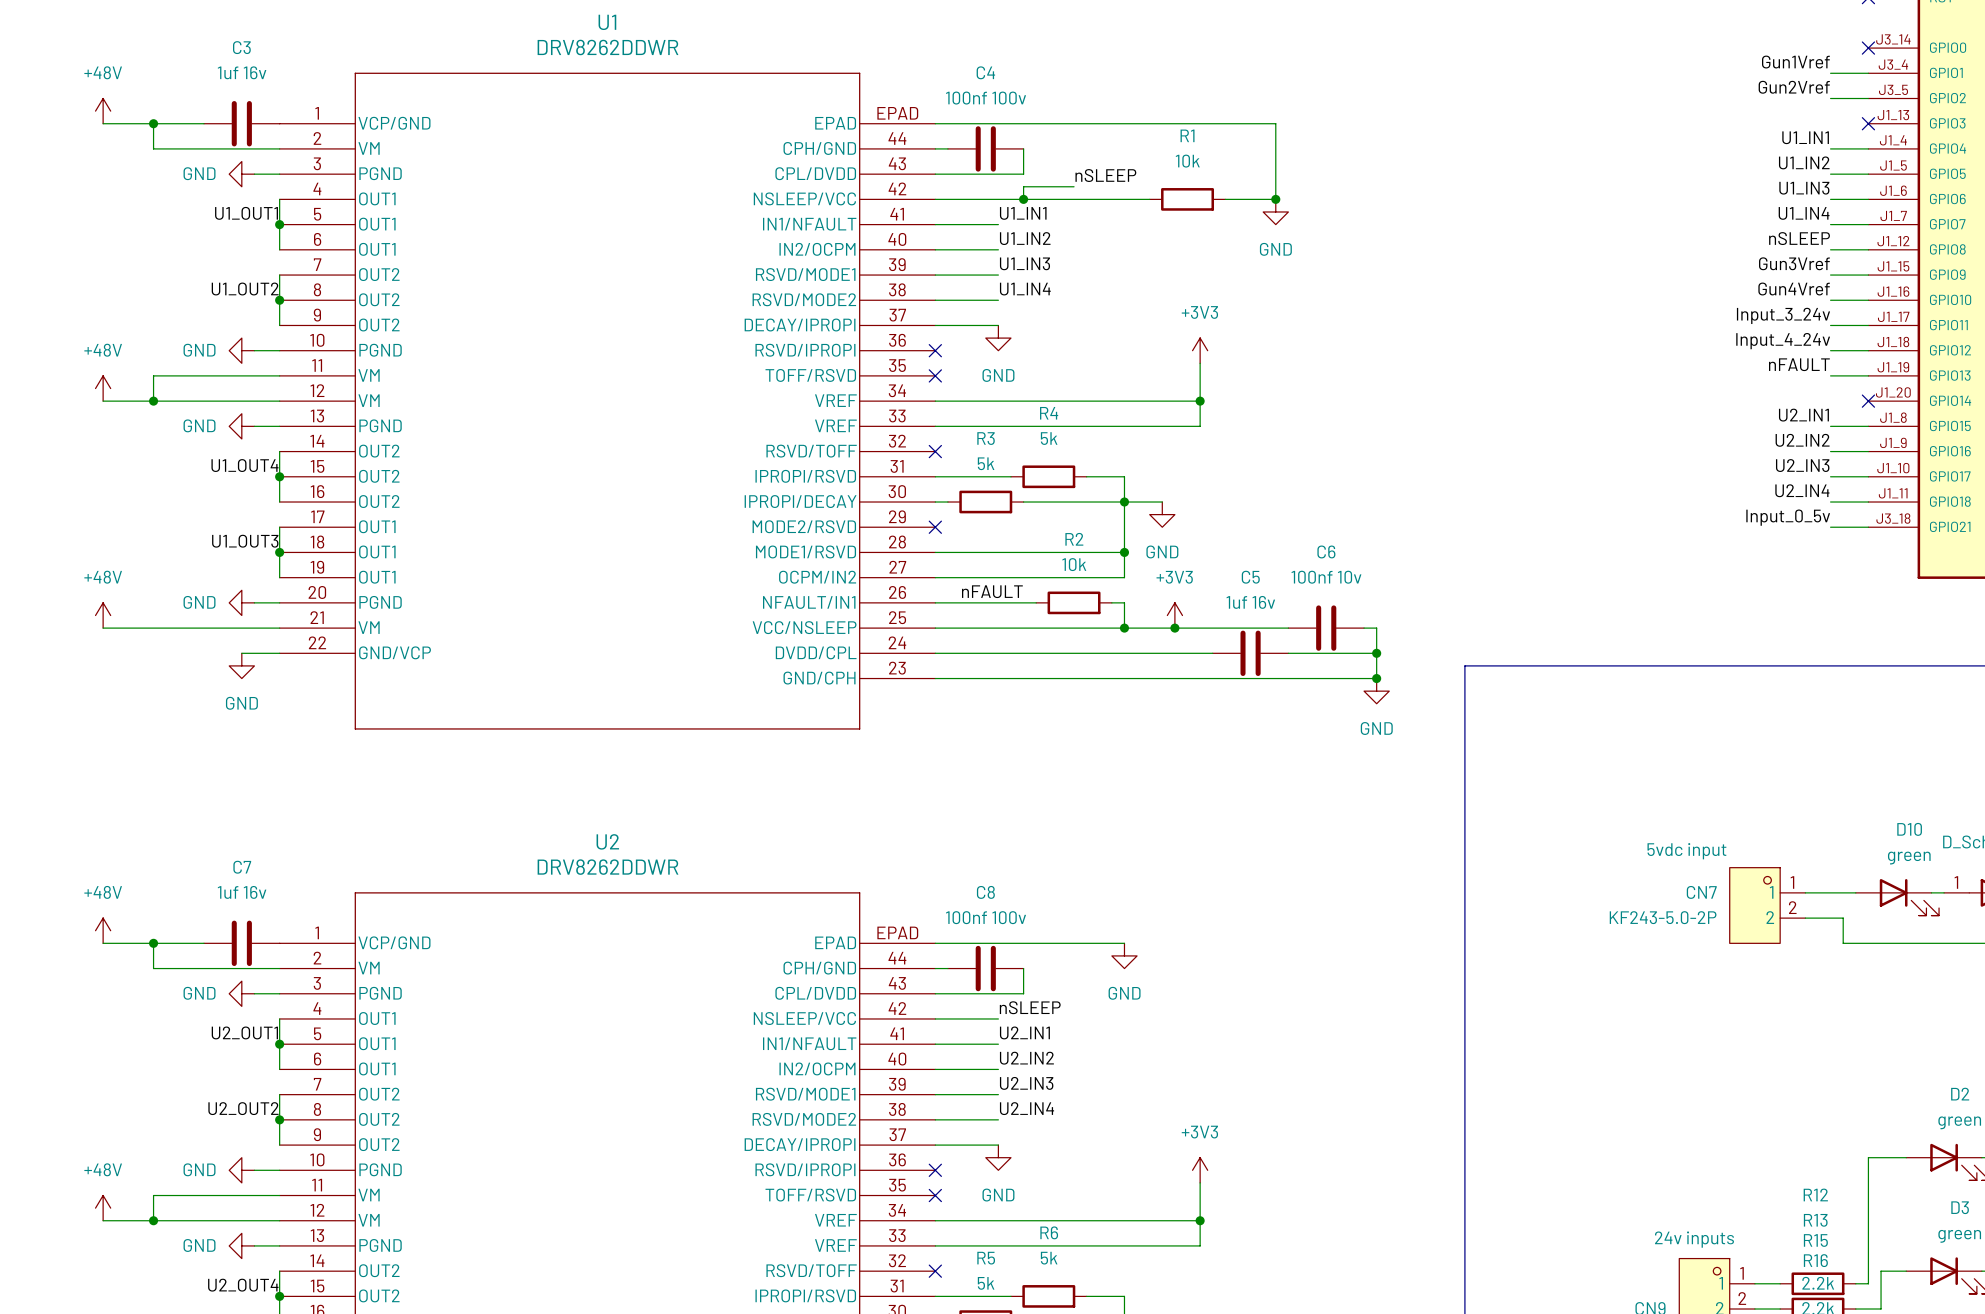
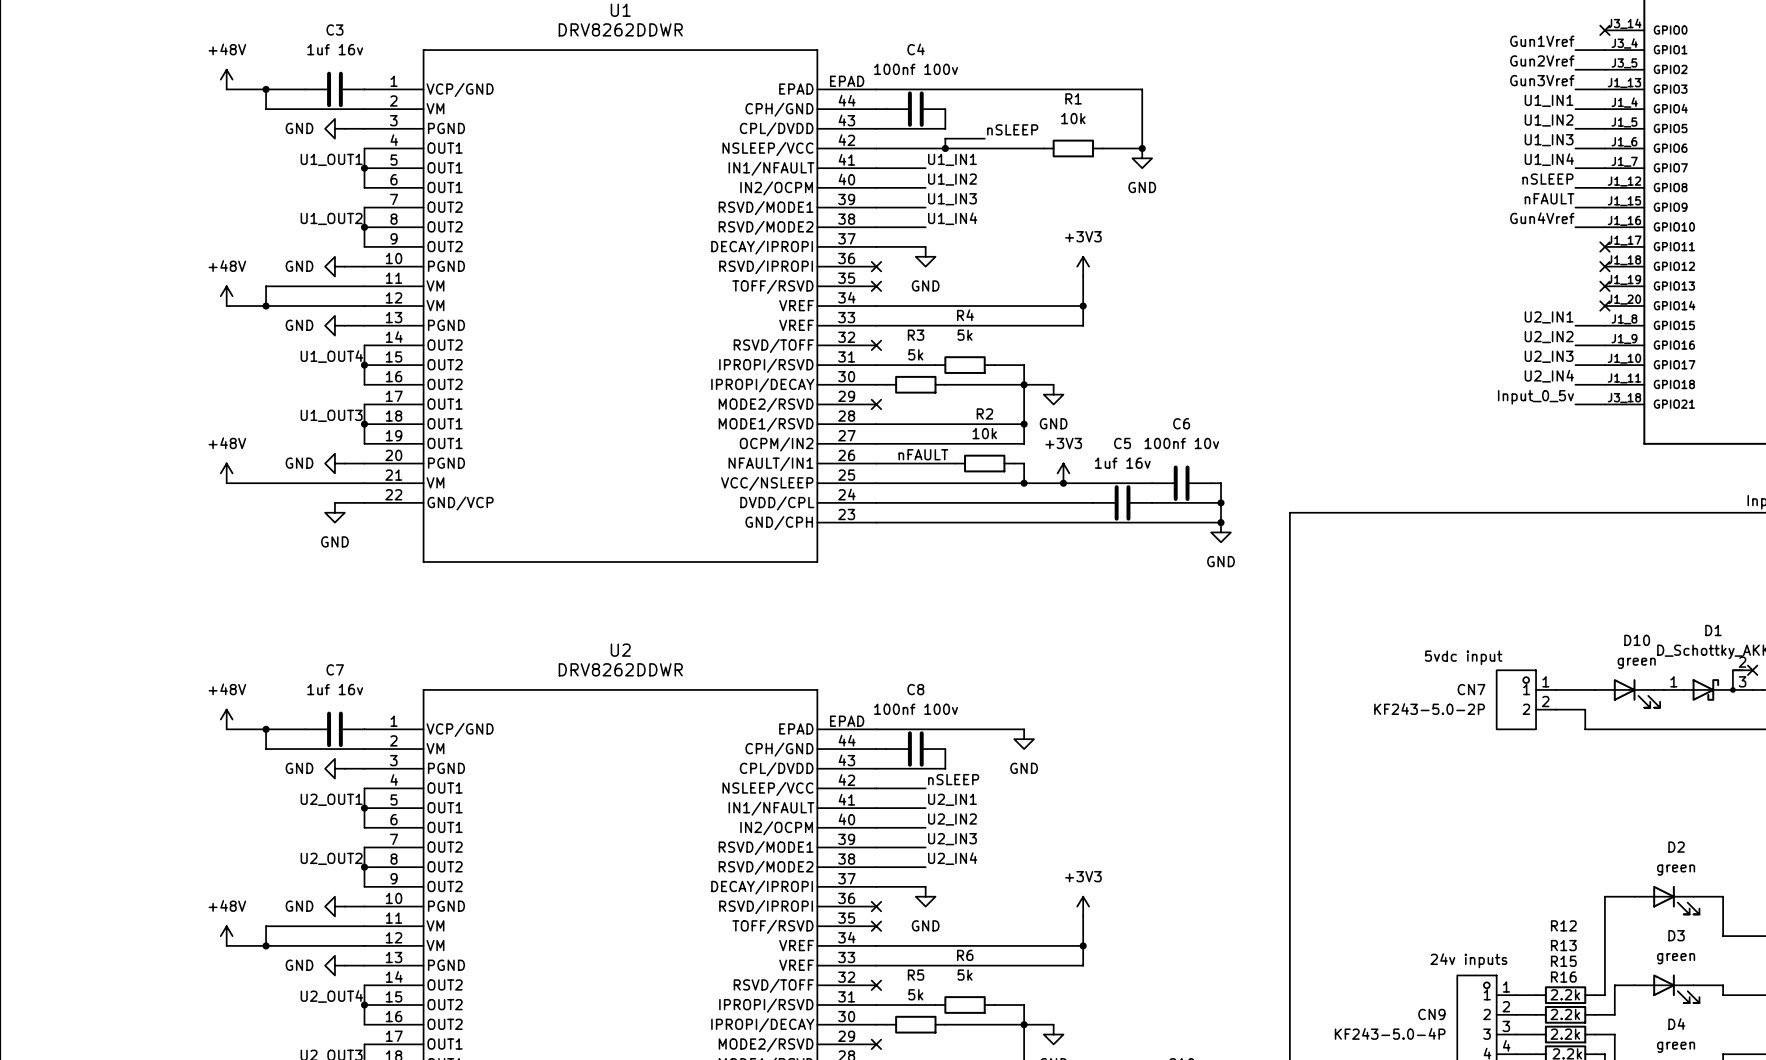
label: none -> Gun3Vref (1542, 80)
no-connect mark: (1868, 123) -> none
label: Gun3Vref (1794, 263) -> nFAULT (1549, 198)
label: Input_3_24v (1783, 315) -> none
wire: (1830, 325) (1868, 325) -> (1575, 89) (1604, 89)
no-connect mark: none -> (1604, 246)
label: Input_4_24v (1783, 341) -> none
wire: (1830, 350) (1868, 350) -> none
no-connect mark: none -> (1604, 266)
label: nFAULT (1799, 364) -> none
wire: (1830, 375) (1868, 375) -> none
no-connect mark: none -> (1604, 286)

